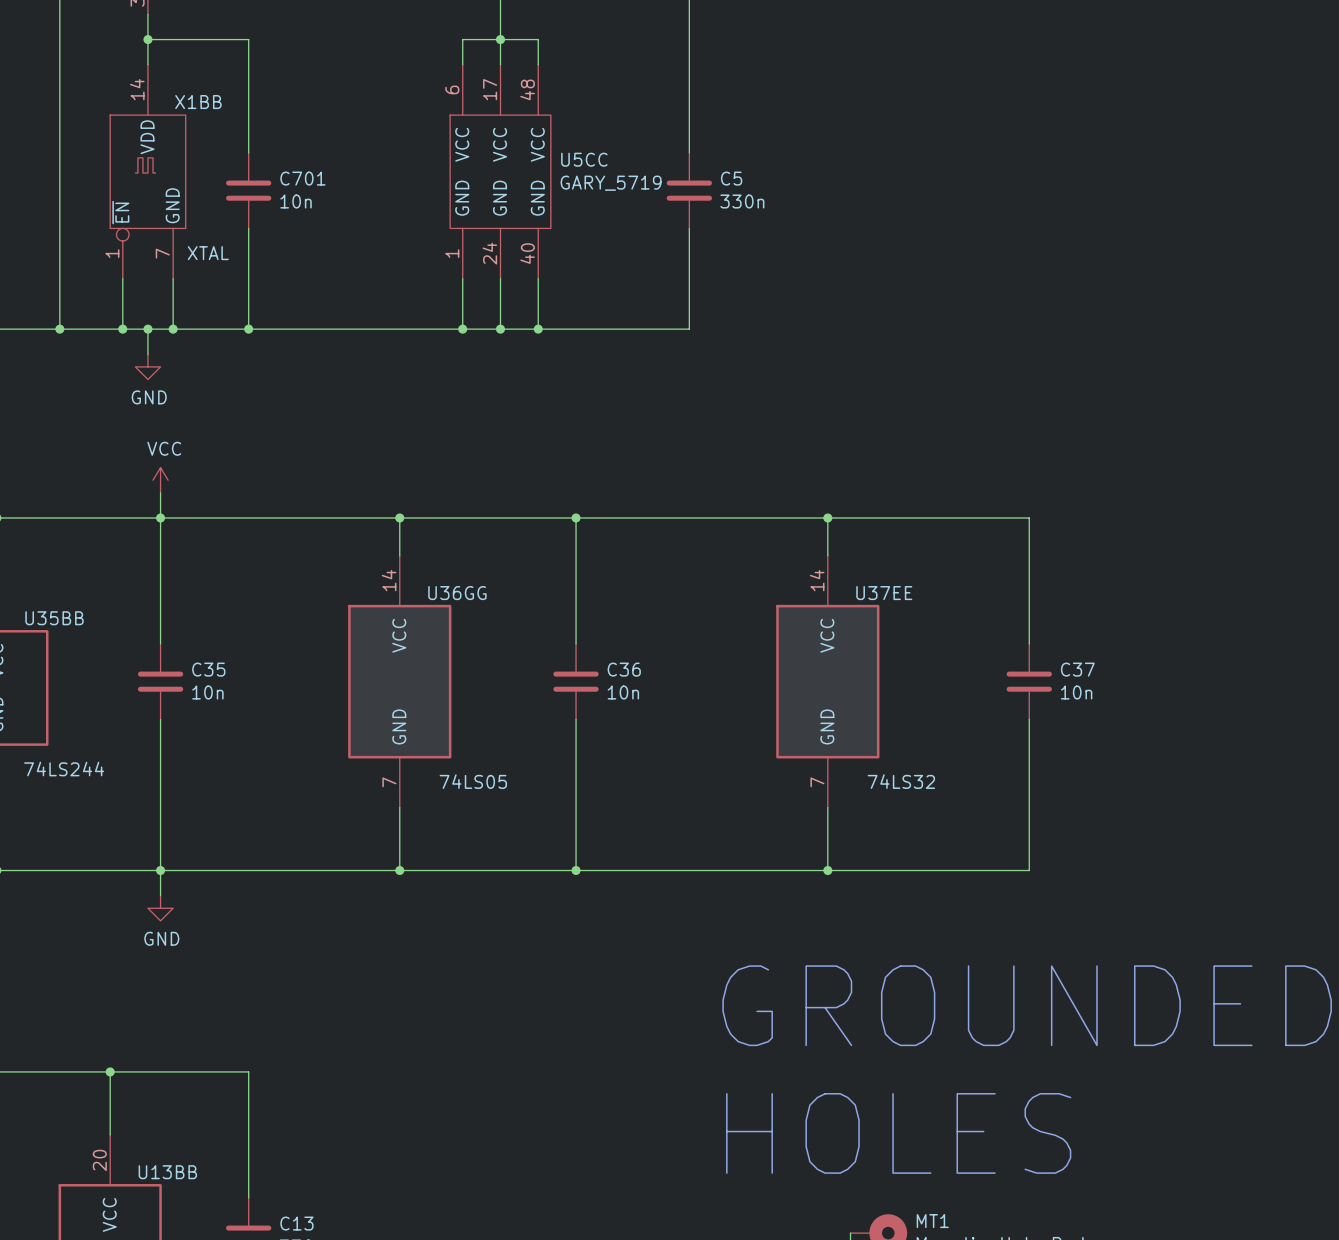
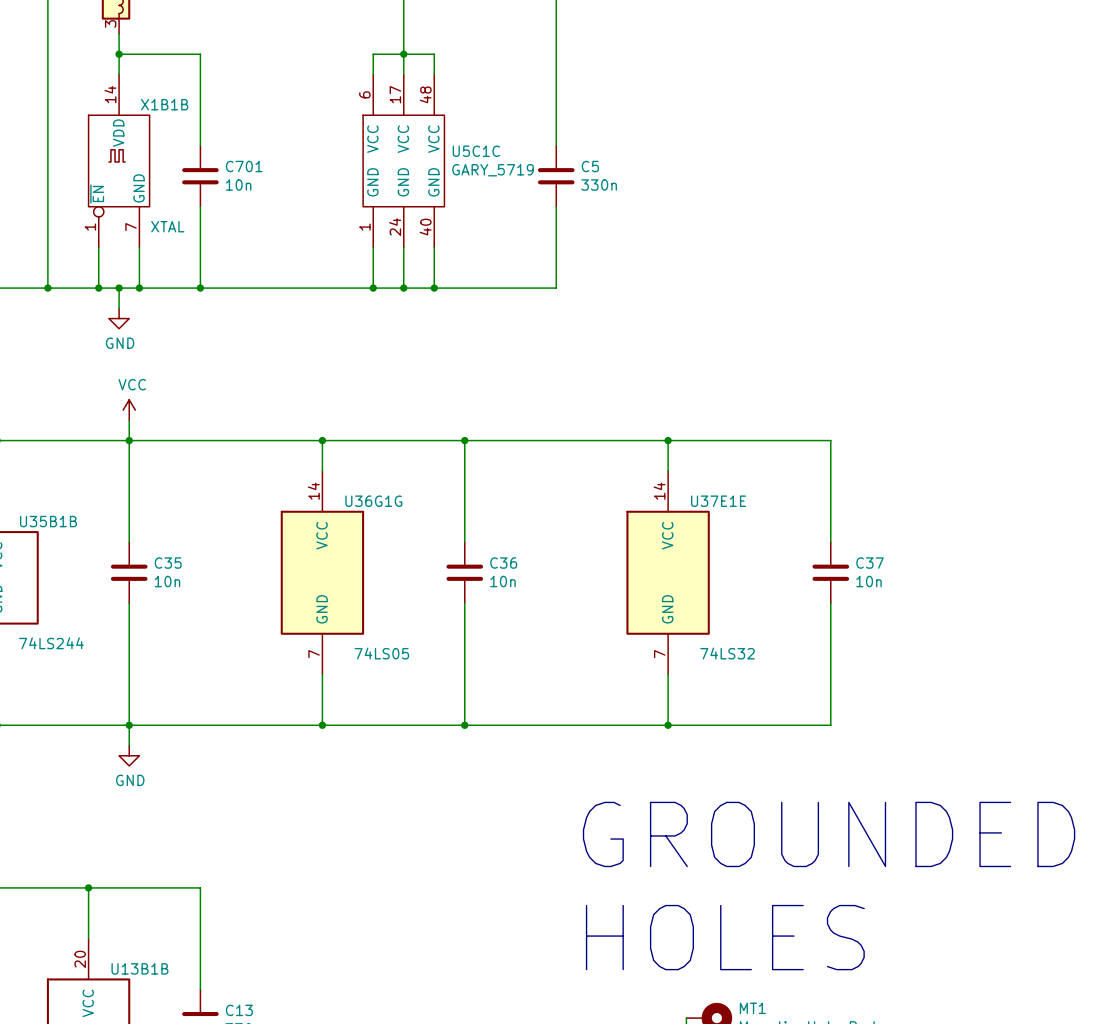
X1BB name: X1BB (198, 102) -> X1B1B (164, 104)
U5CC name: U5CC (584, 159) -> U5C1C (476, 151)
U36GG name: U36GG (457, 593) -> U36G1G (373, 501)
U37EE name: U37EE (884, 593) -> U37E1E (718, 501)
U35BB name: U35BB (54, 618) -> U35B1B (48, 521)
U13BB name: U13BB (167, 1172) -> U13B1B (139, 968)

